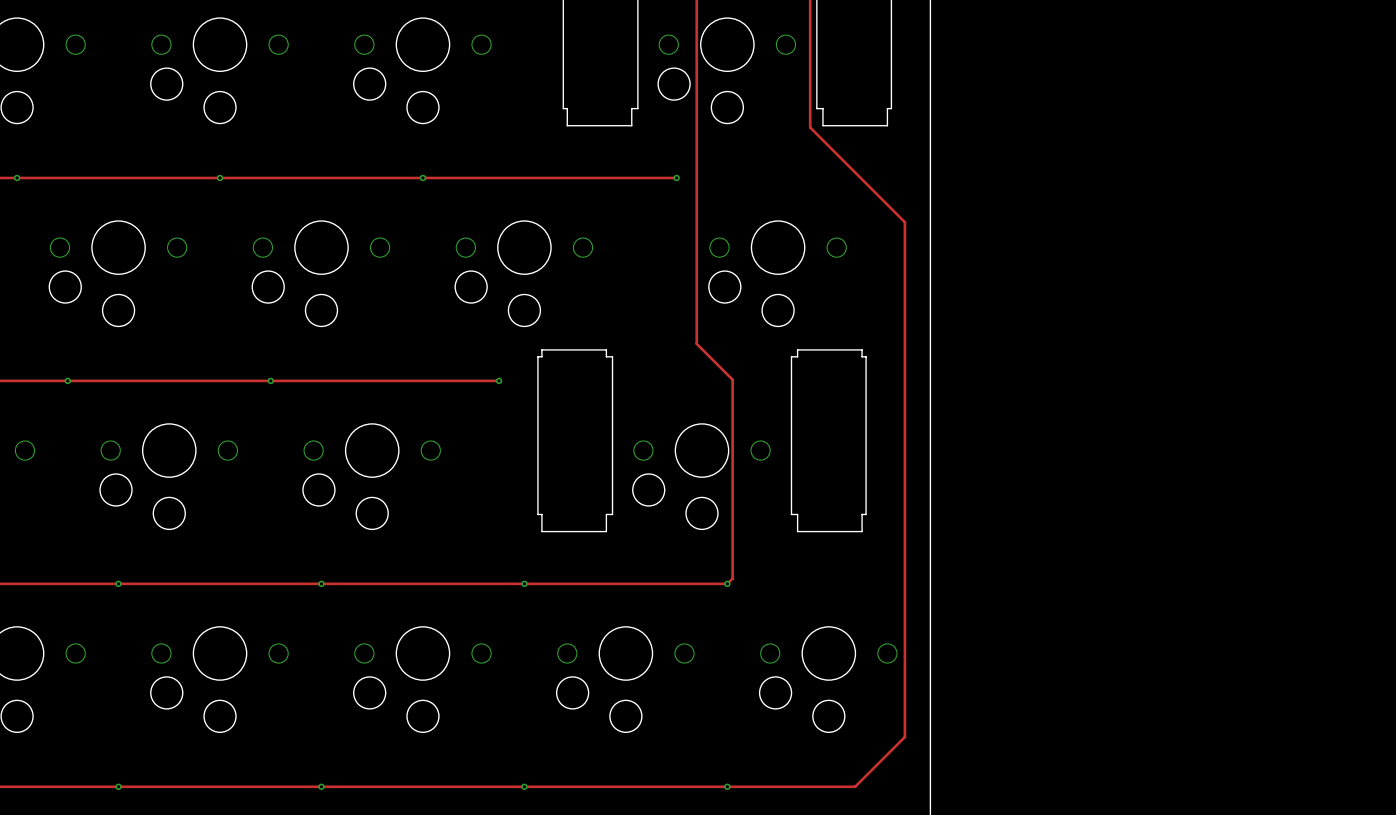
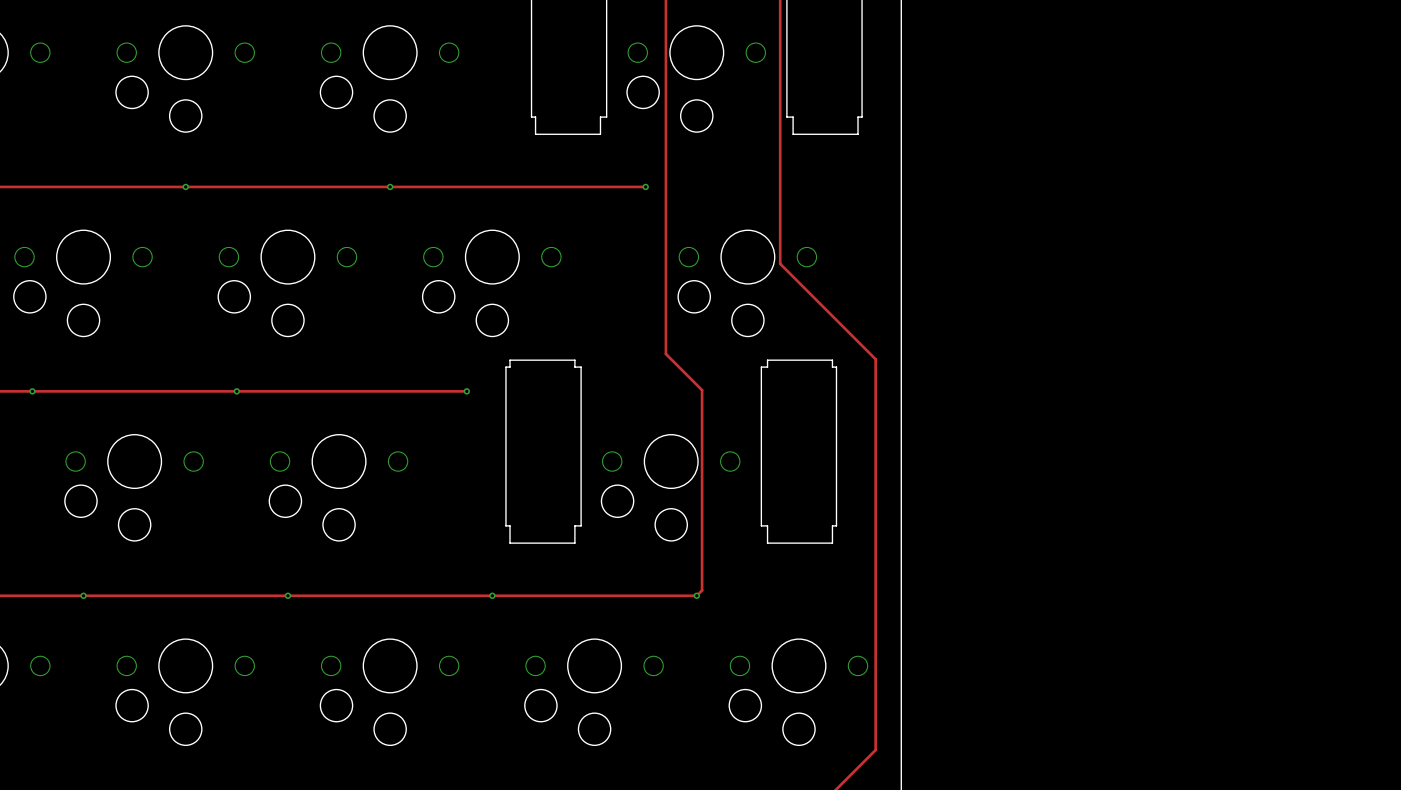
track: (810, 127) (904, 222) (904, 349) -> (780, 136) (780, 263) (875, 359)

